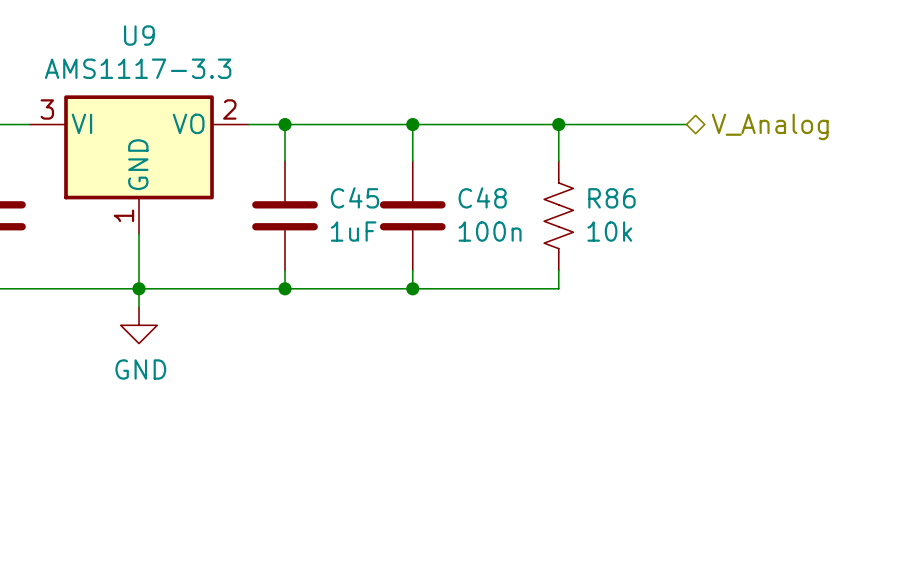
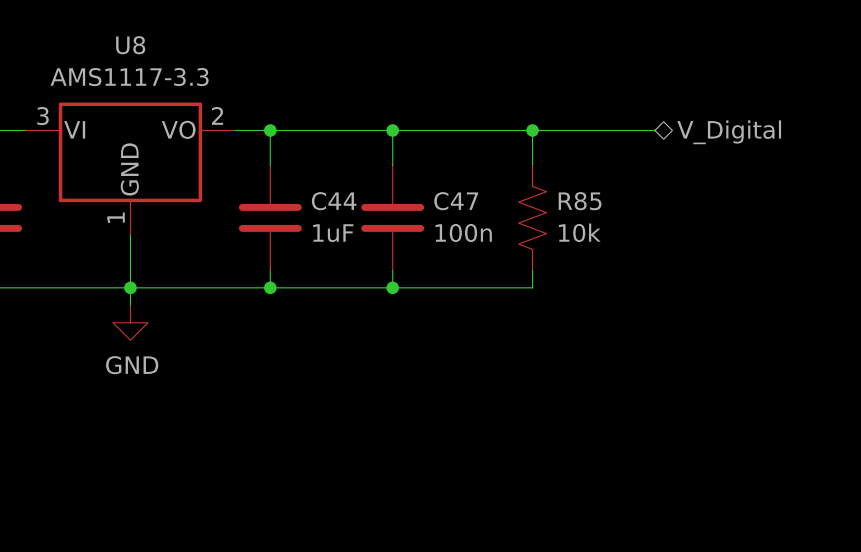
U9 name: U9 (139, 35) -> U8 (130, 45)
hierarchical label: V_Analog (770, 126) -> V_Digital (729, 132)
C45 name: C45 (354, 197) -> C44 (334, 201)
C48 name: C48 (482, 197) -> C47 (456, 201)
R86 name: R86 (611, 198) -> R85 (580, 201)

